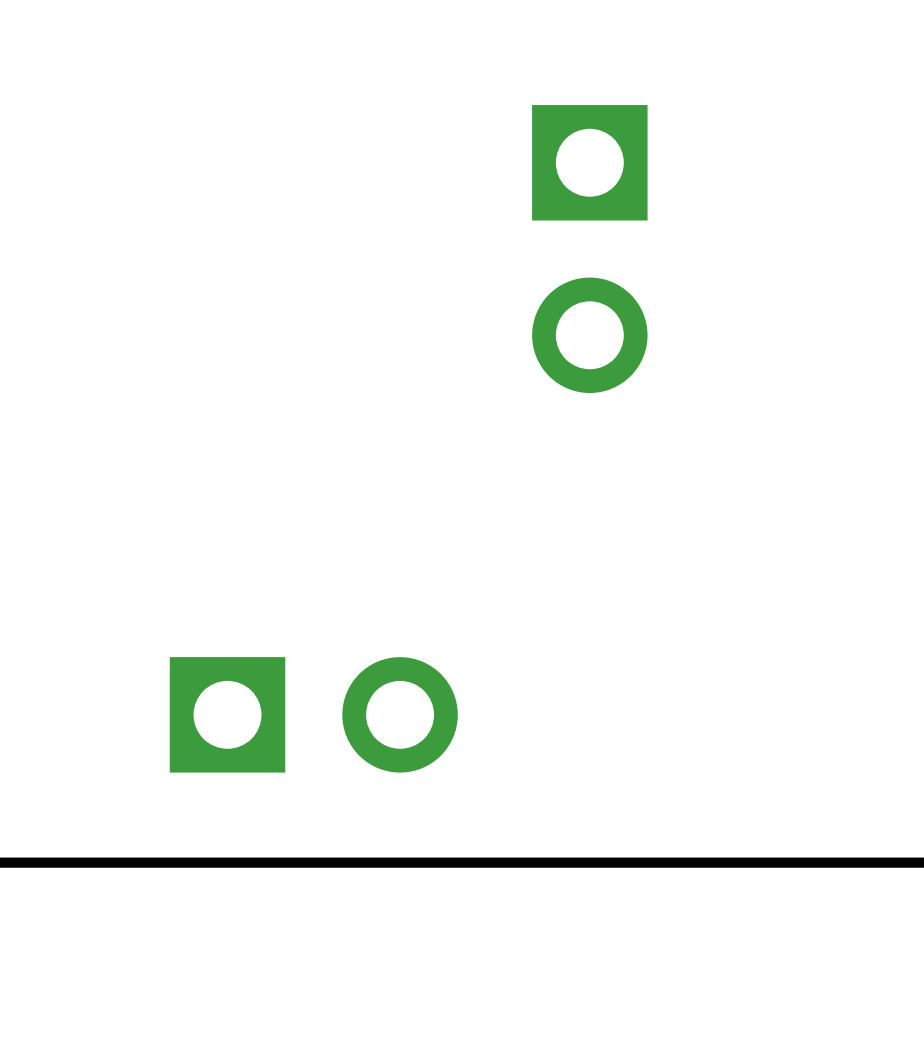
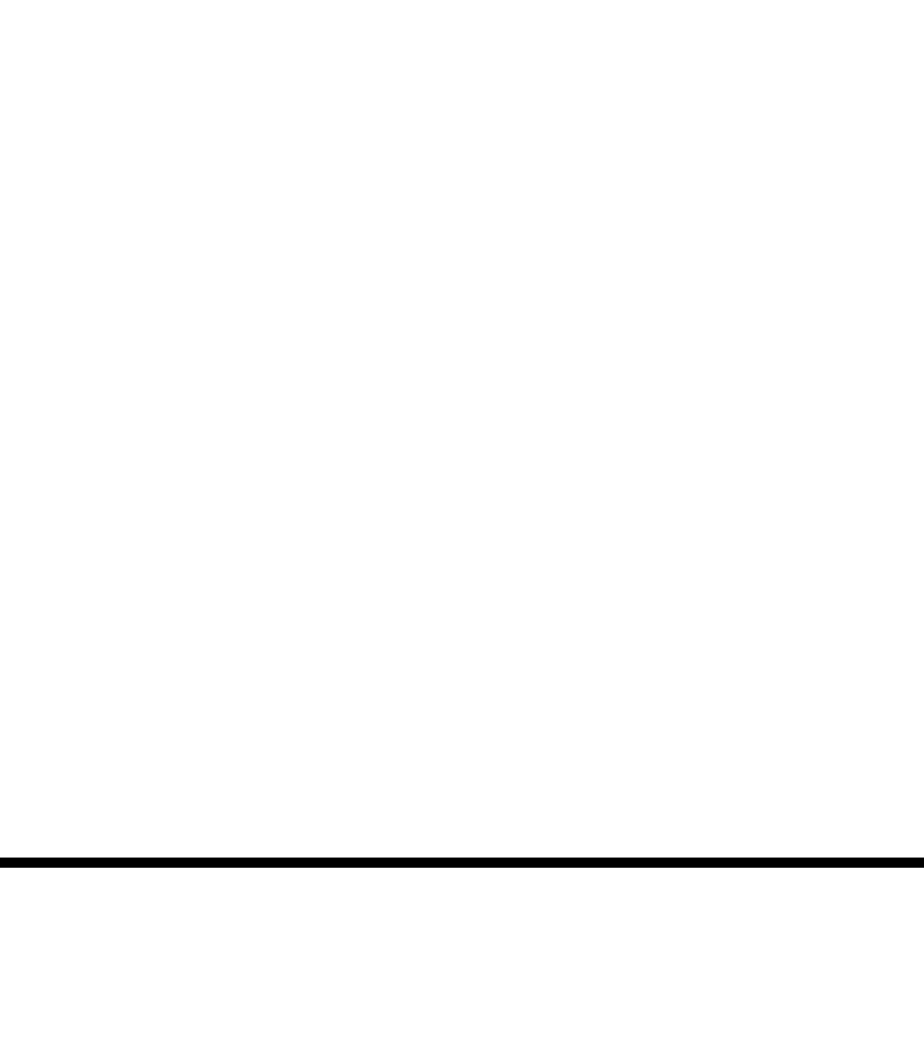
part: (589, 249) -> none
part: (313, 714) -> none

